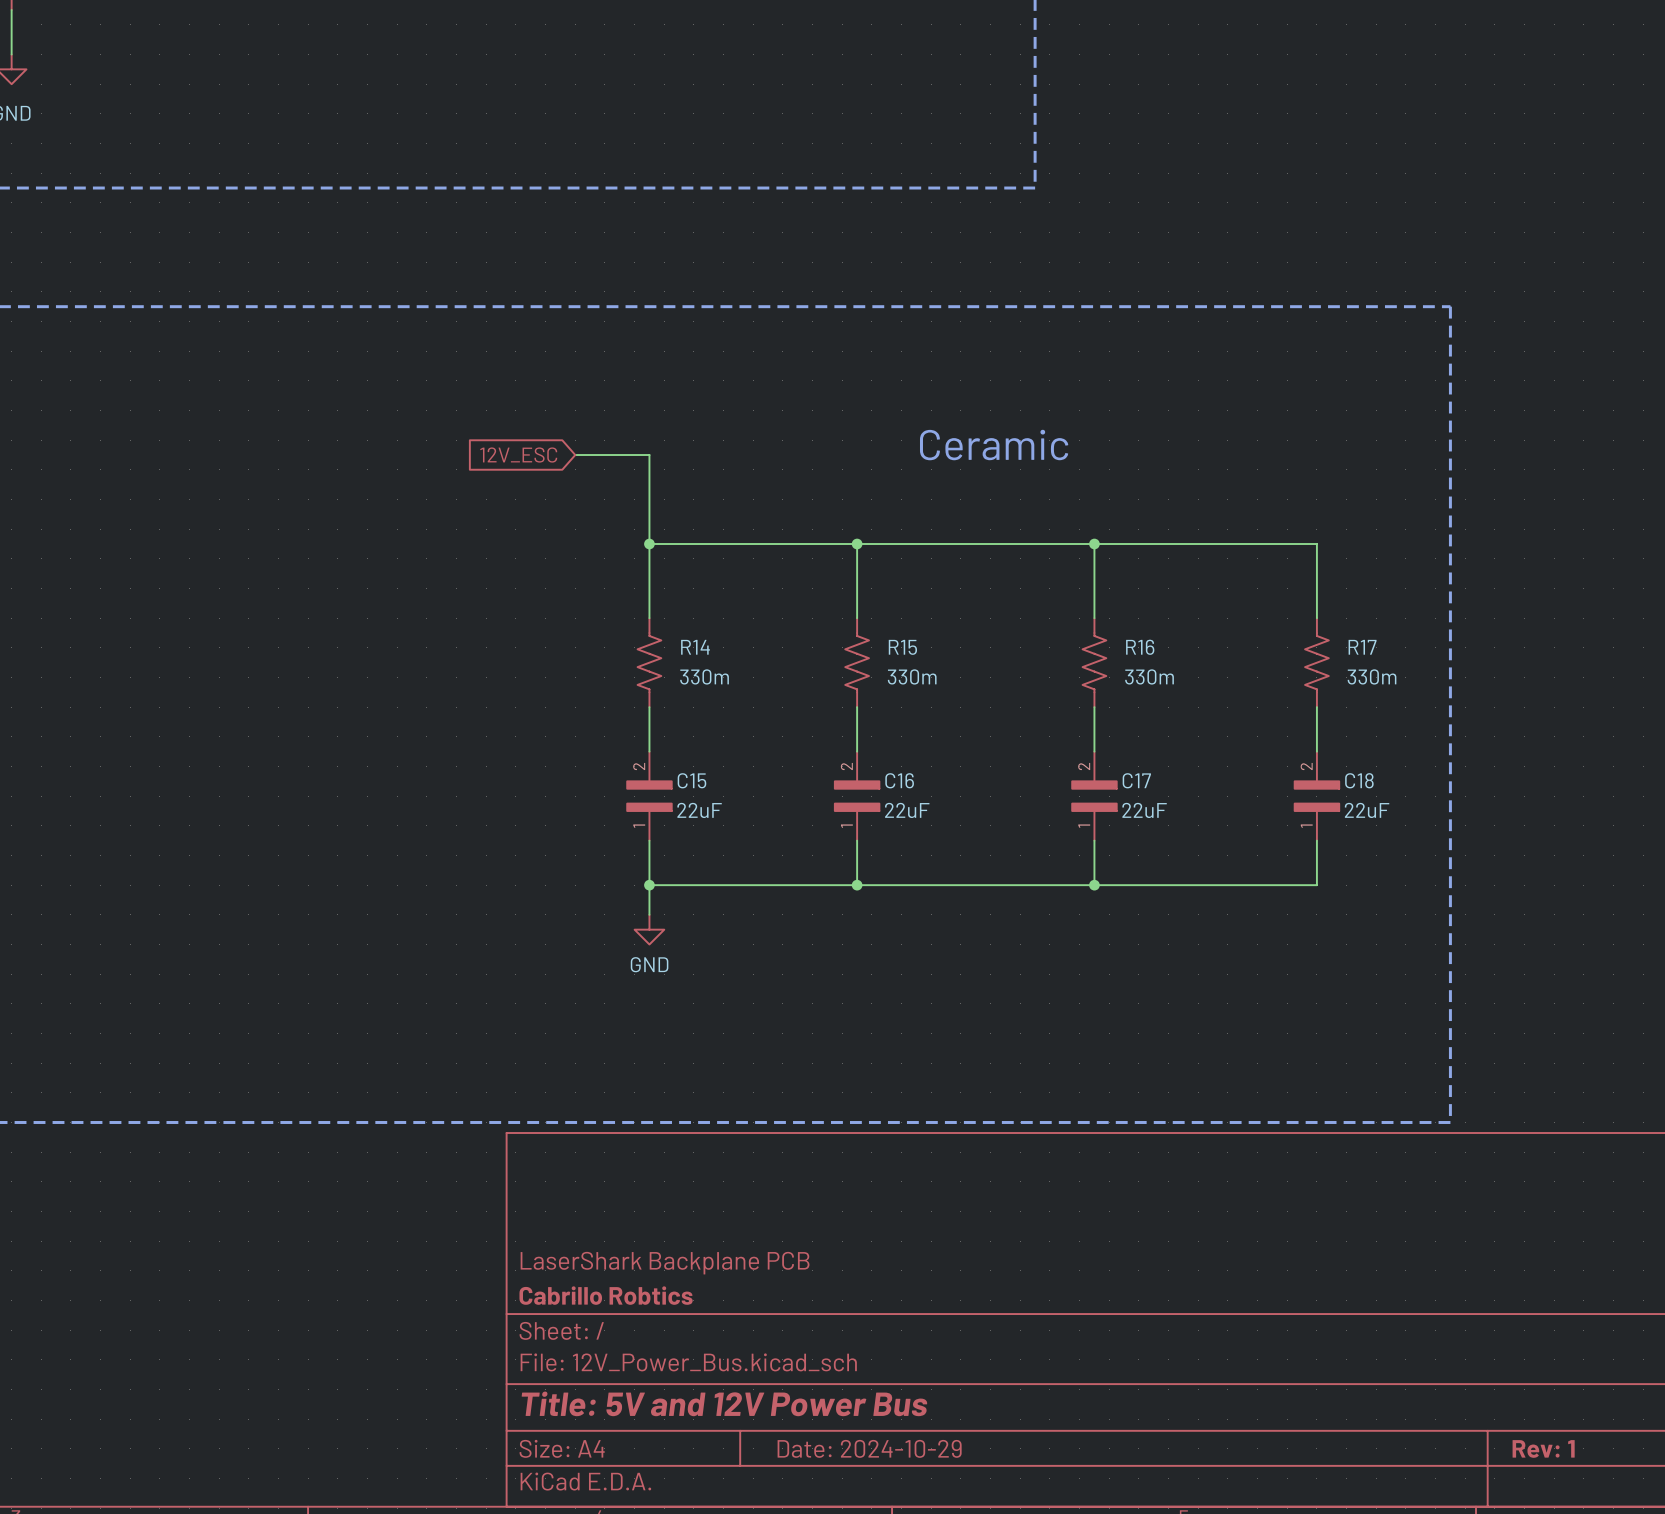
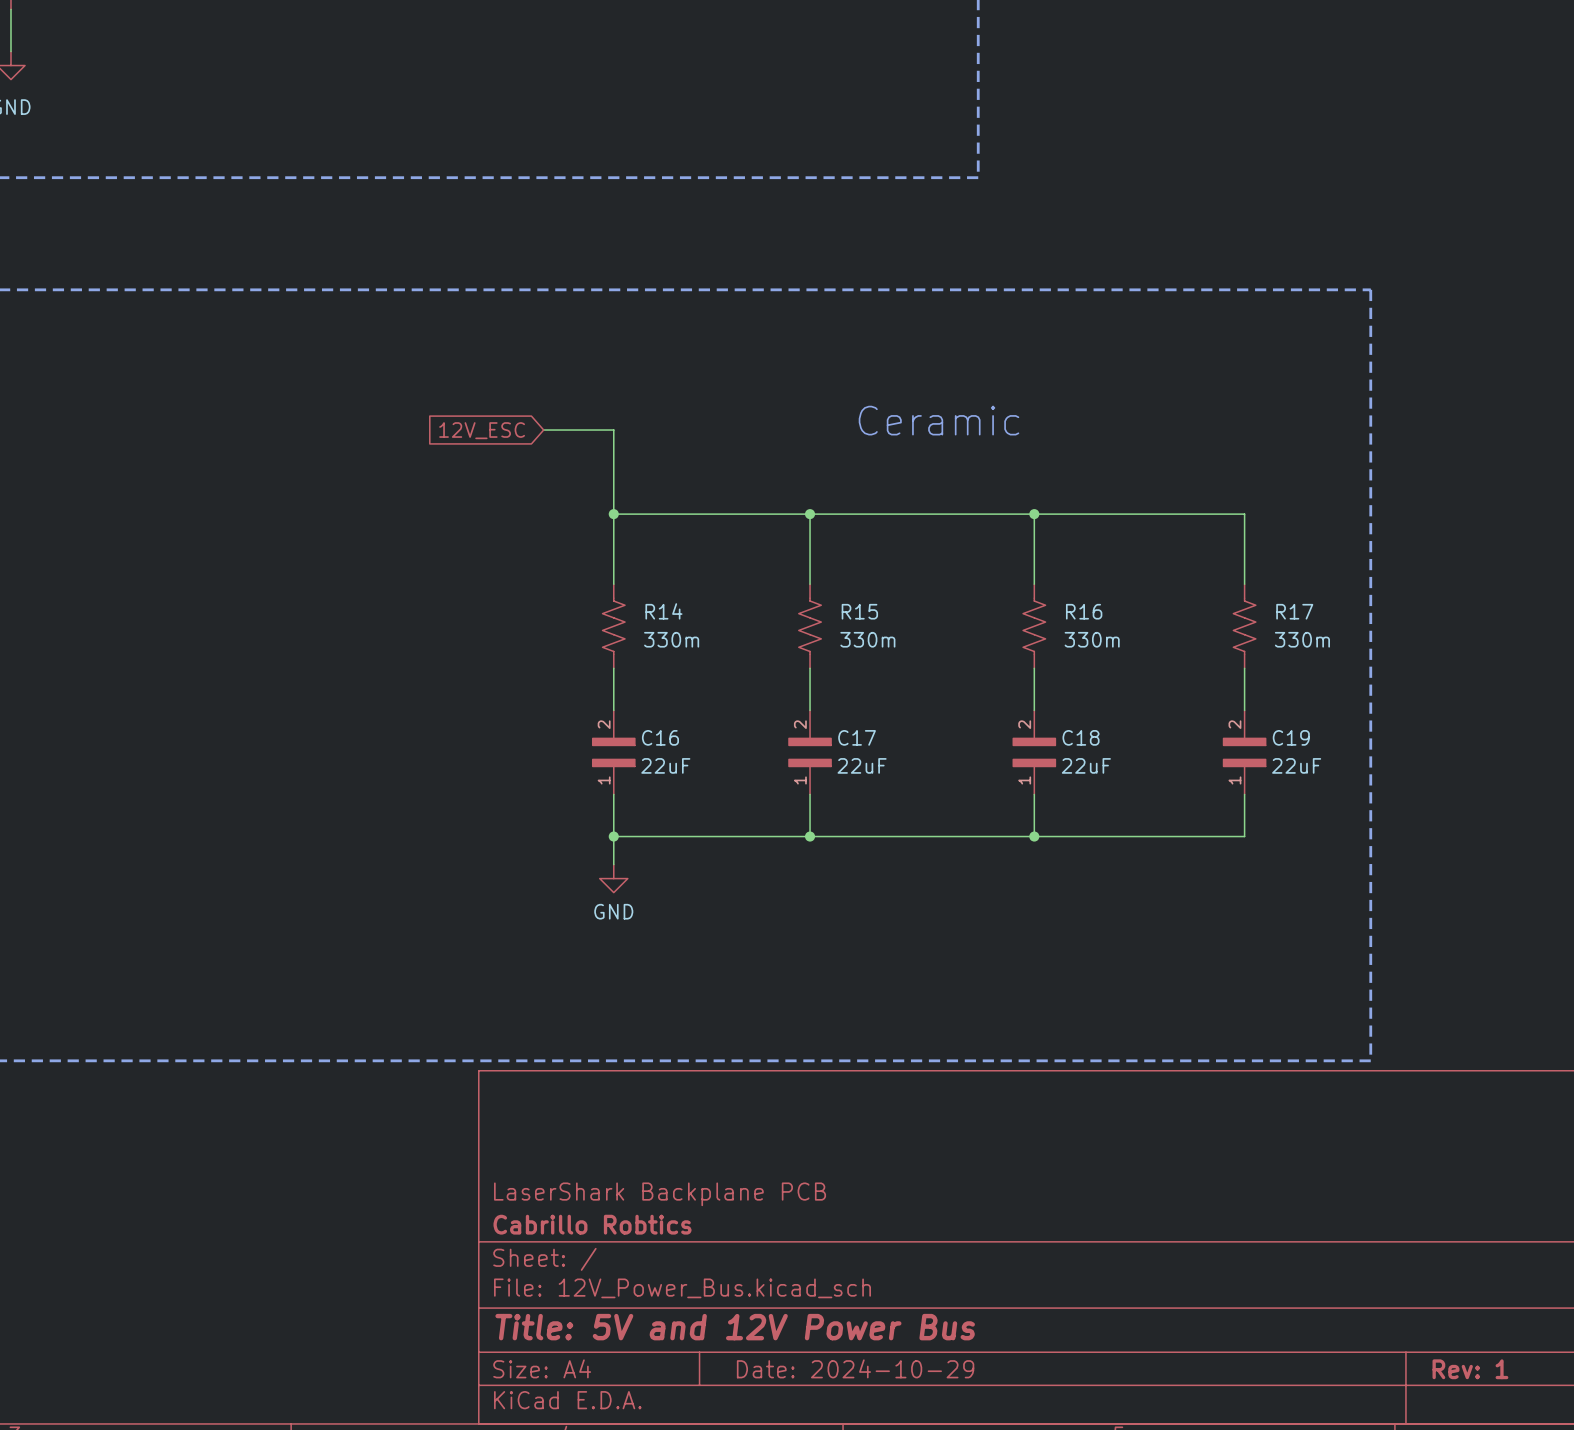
C15 name: C15 (691, 780) -> C16 (660, 737)
C16 name: C16 (899, 780) -> C17 (857, 737)
C17 name: C17 (1136, 780) -> C18 (1081, 737)
C18 name: C18 (1359, 780) -> C19 (1291, 737)

